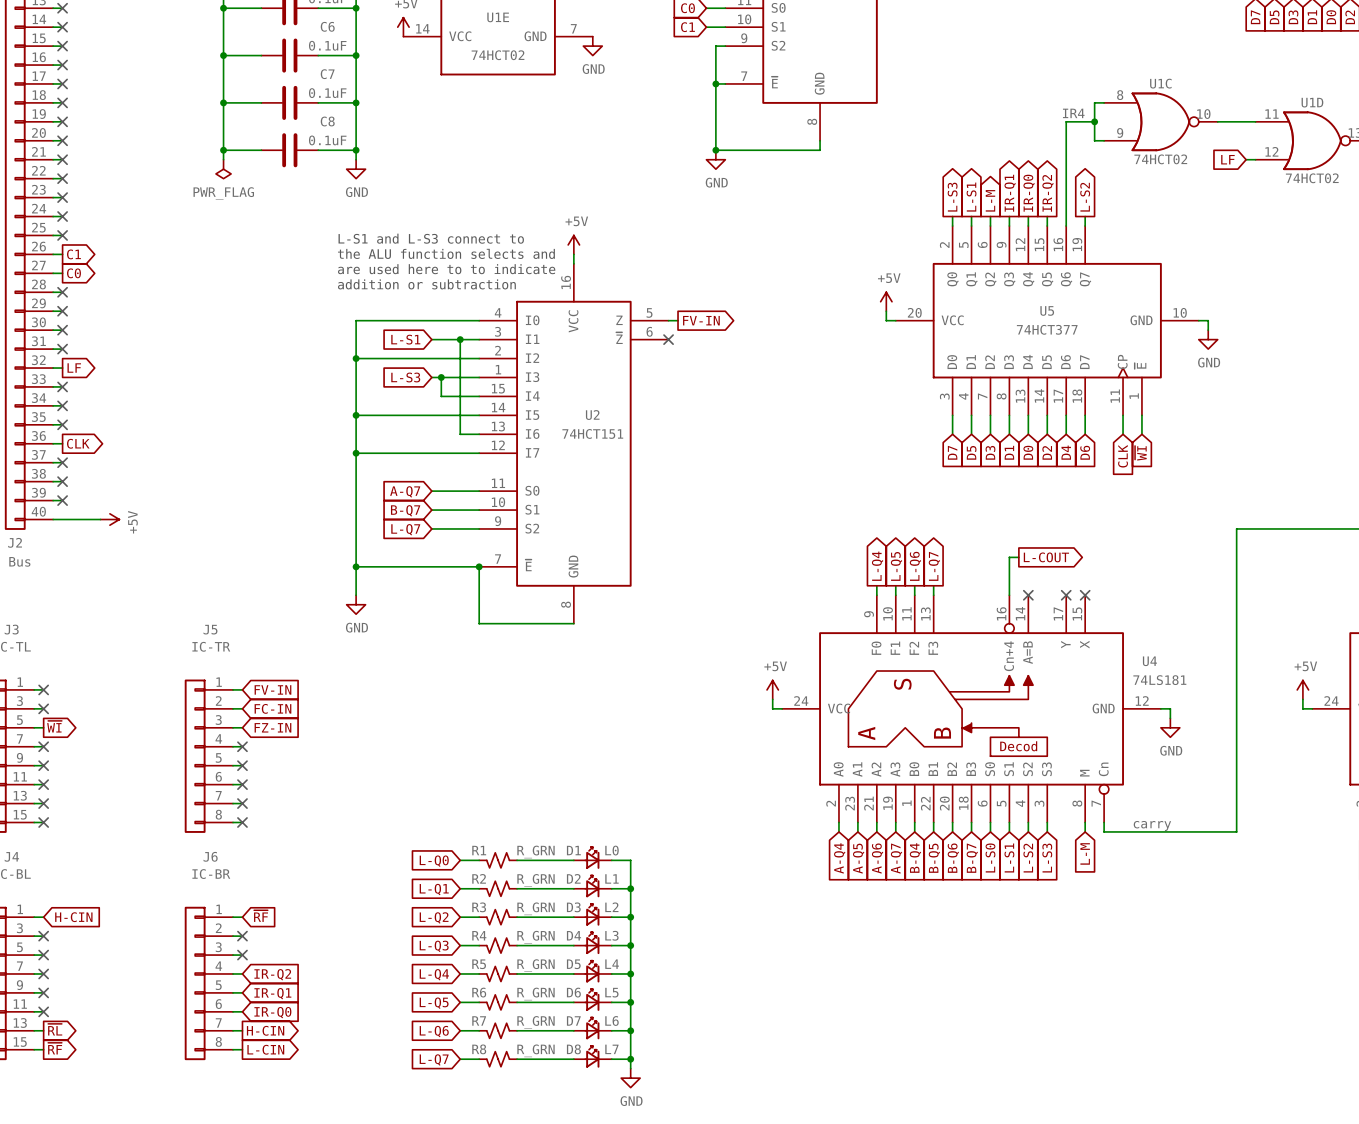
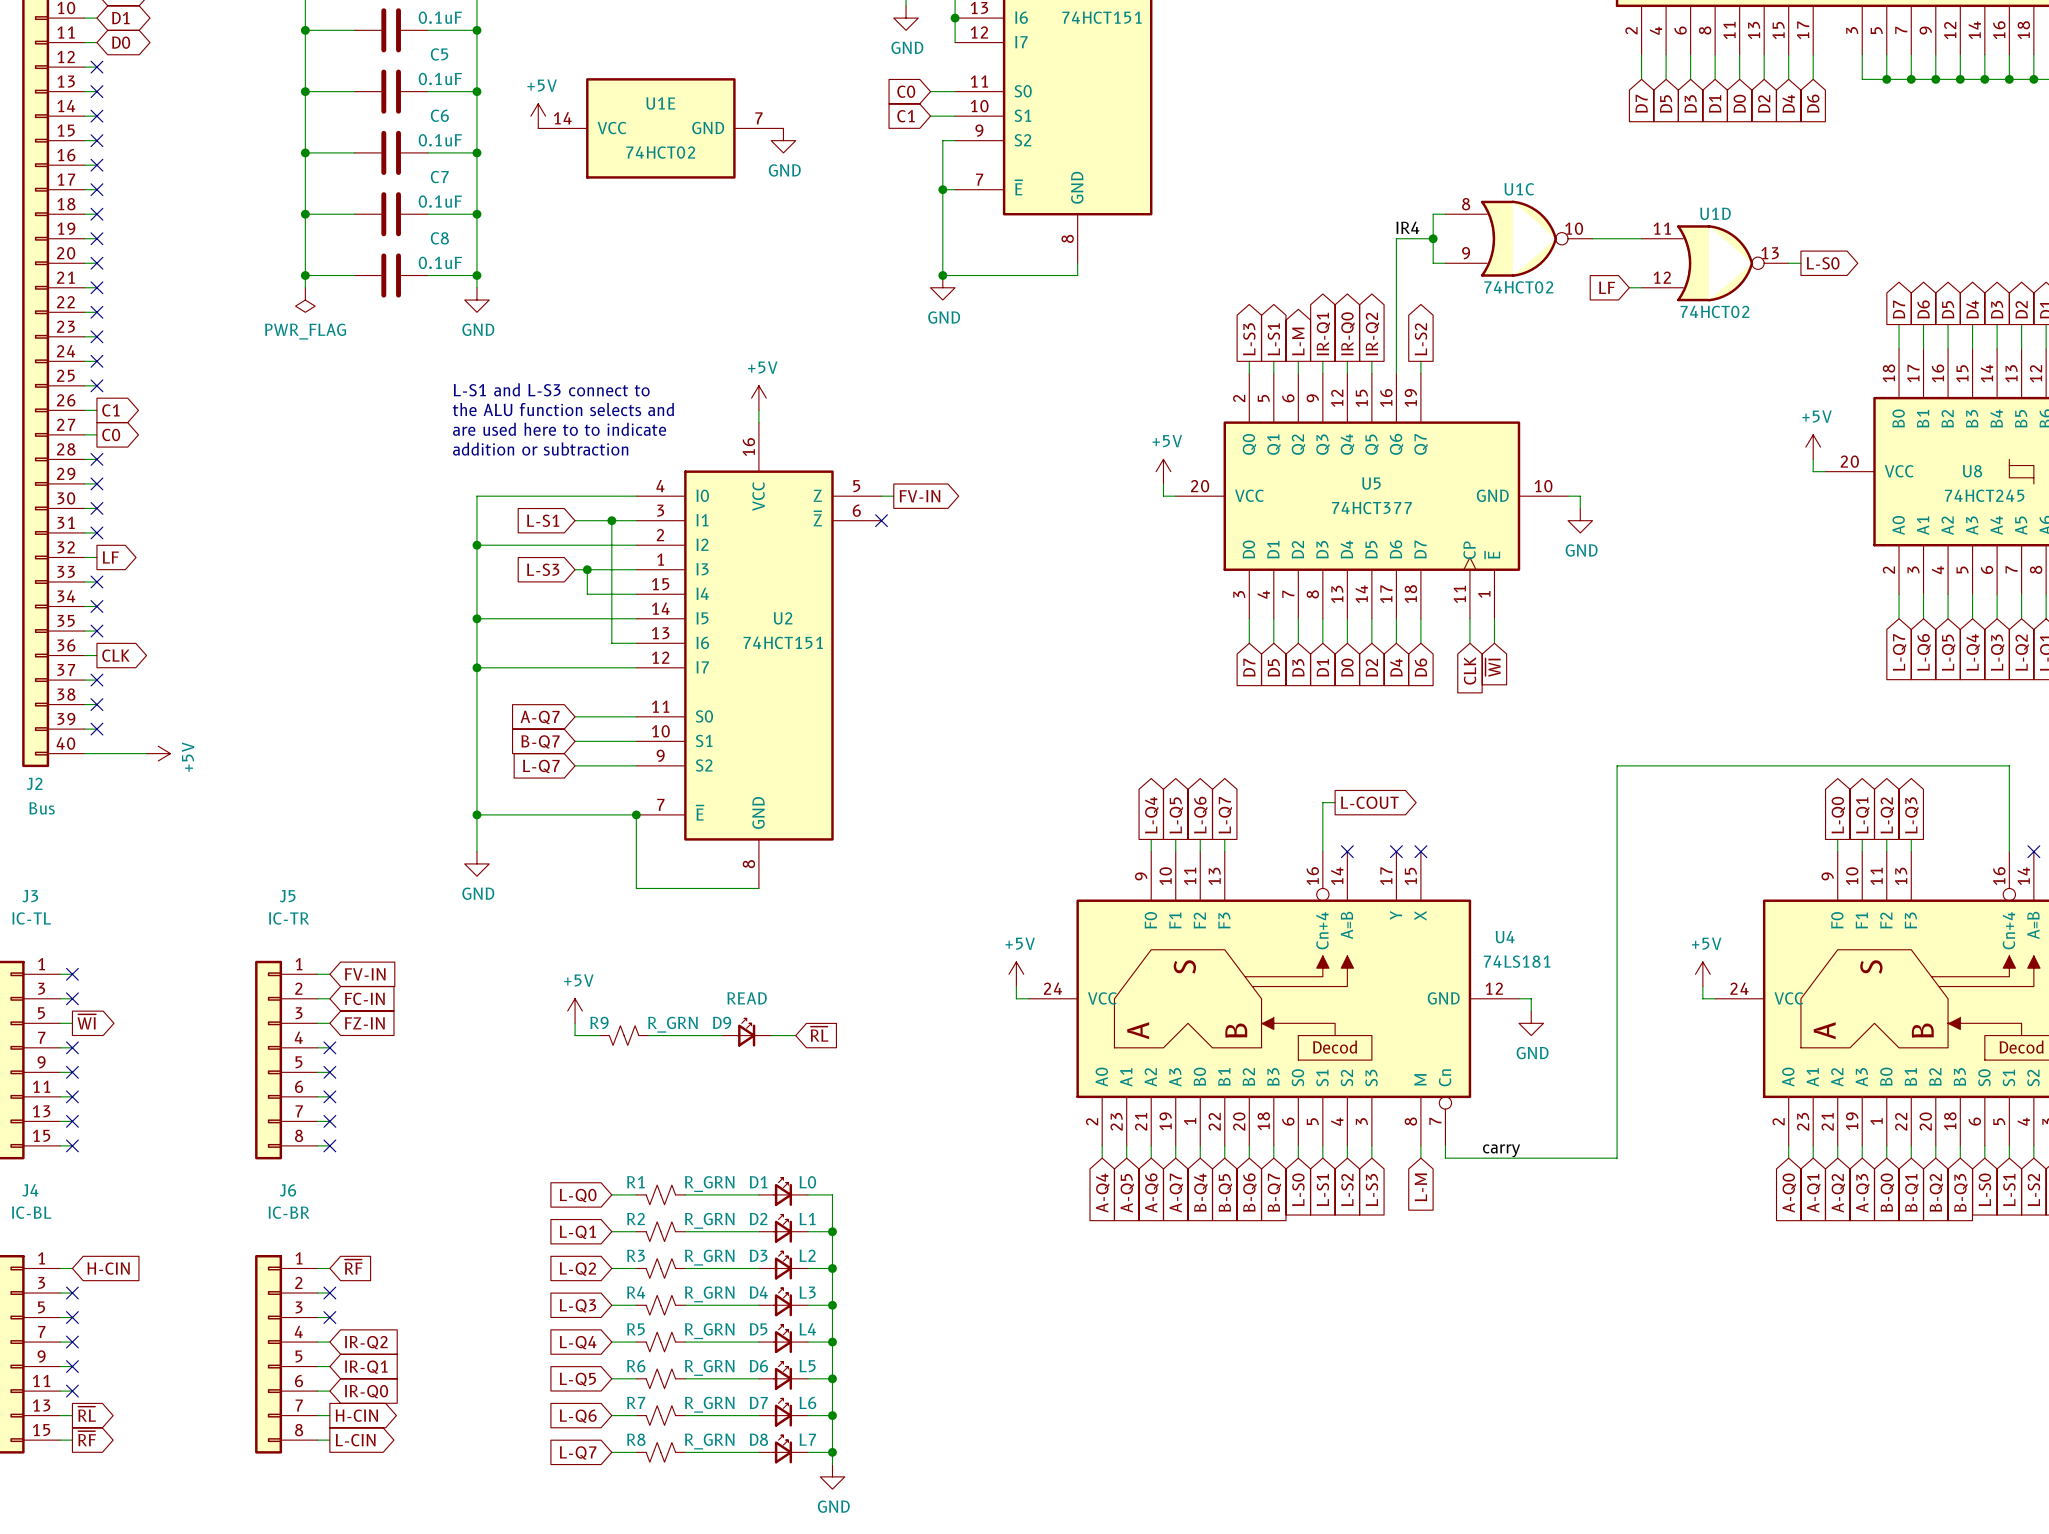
power symbol: none -> +5V (575, 1011)
wire: none -> (575, 1023) (575, 1035) (599, 1035)
D9: none -> READ (746, 1032)
global label: none -> ~{RL} (819, 1034)
R9: none -> R_GRN (624, 1035)
wire: none -> (648, 1035) (722, 1035)
wire: none -> (771, 1035) (795, 1035)

